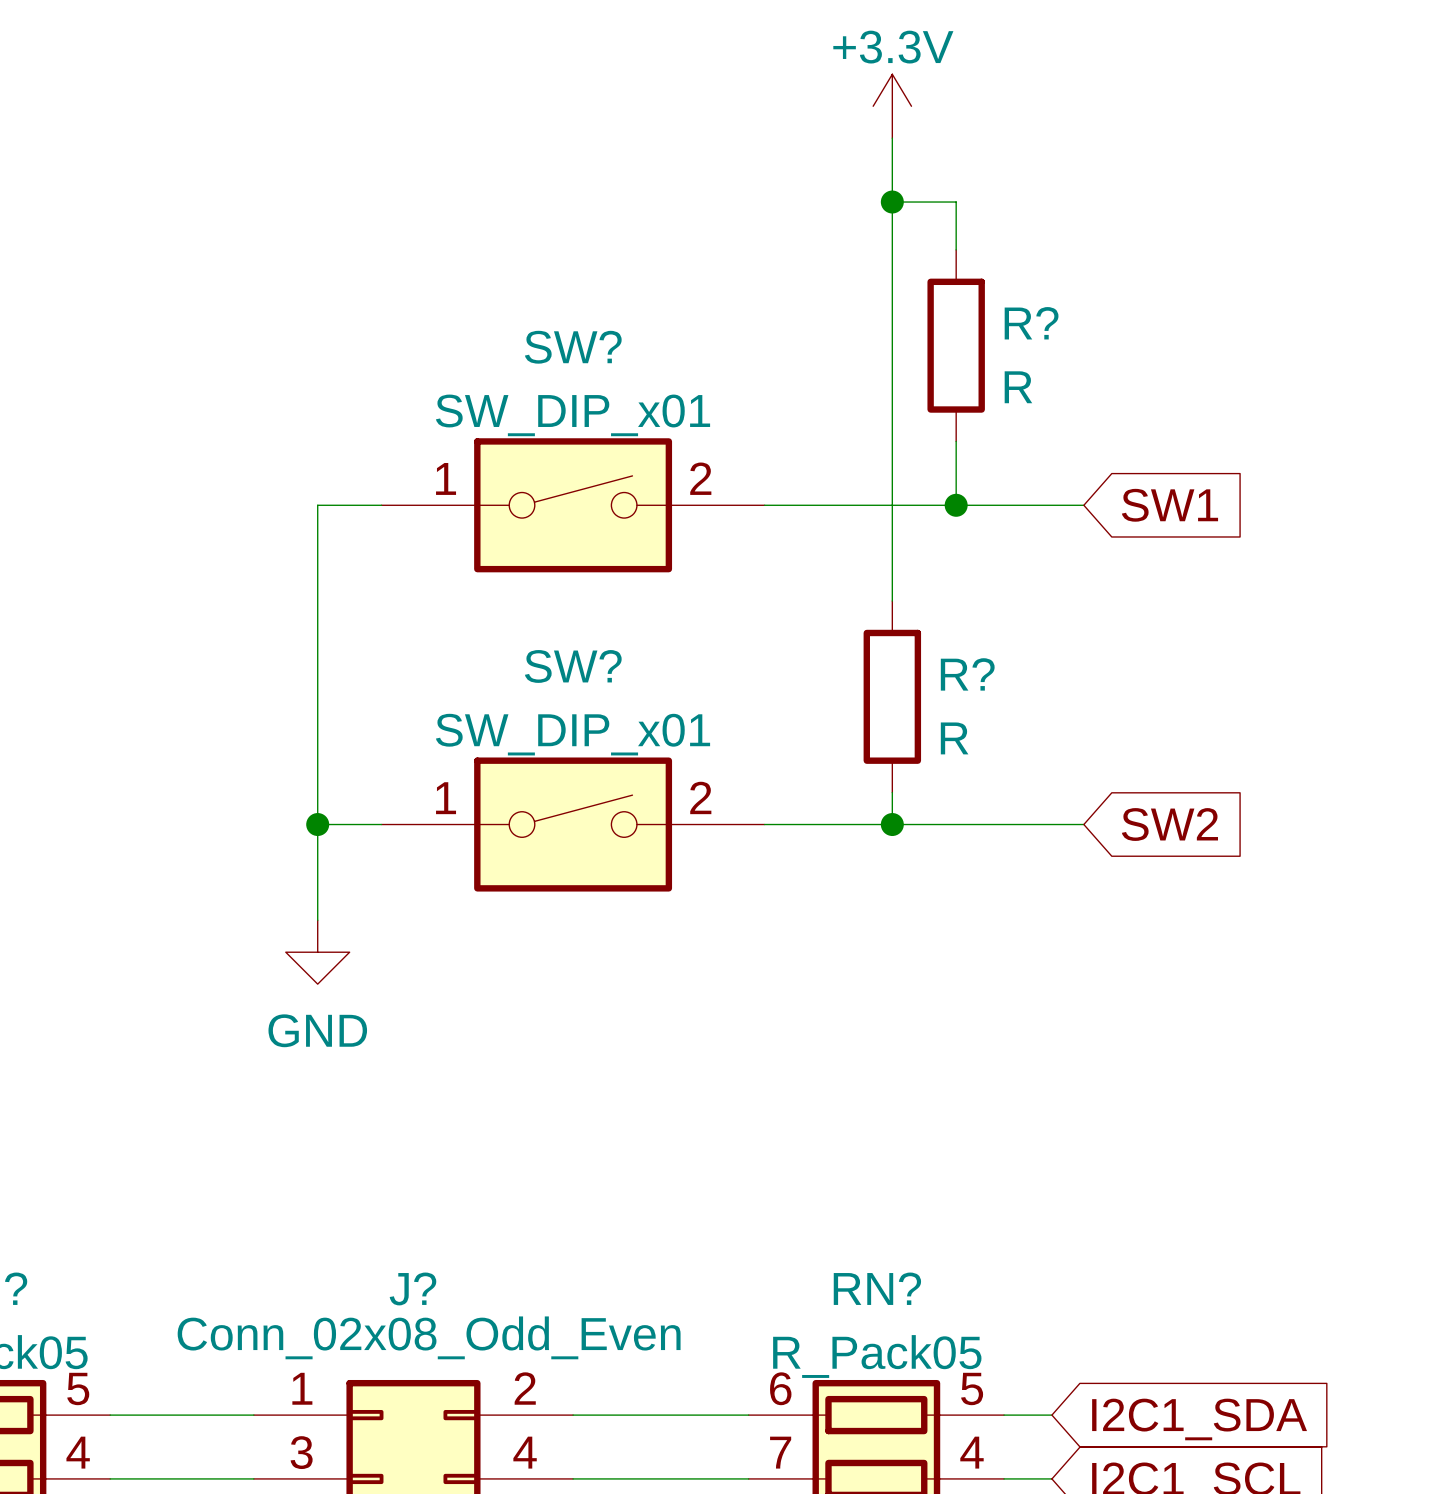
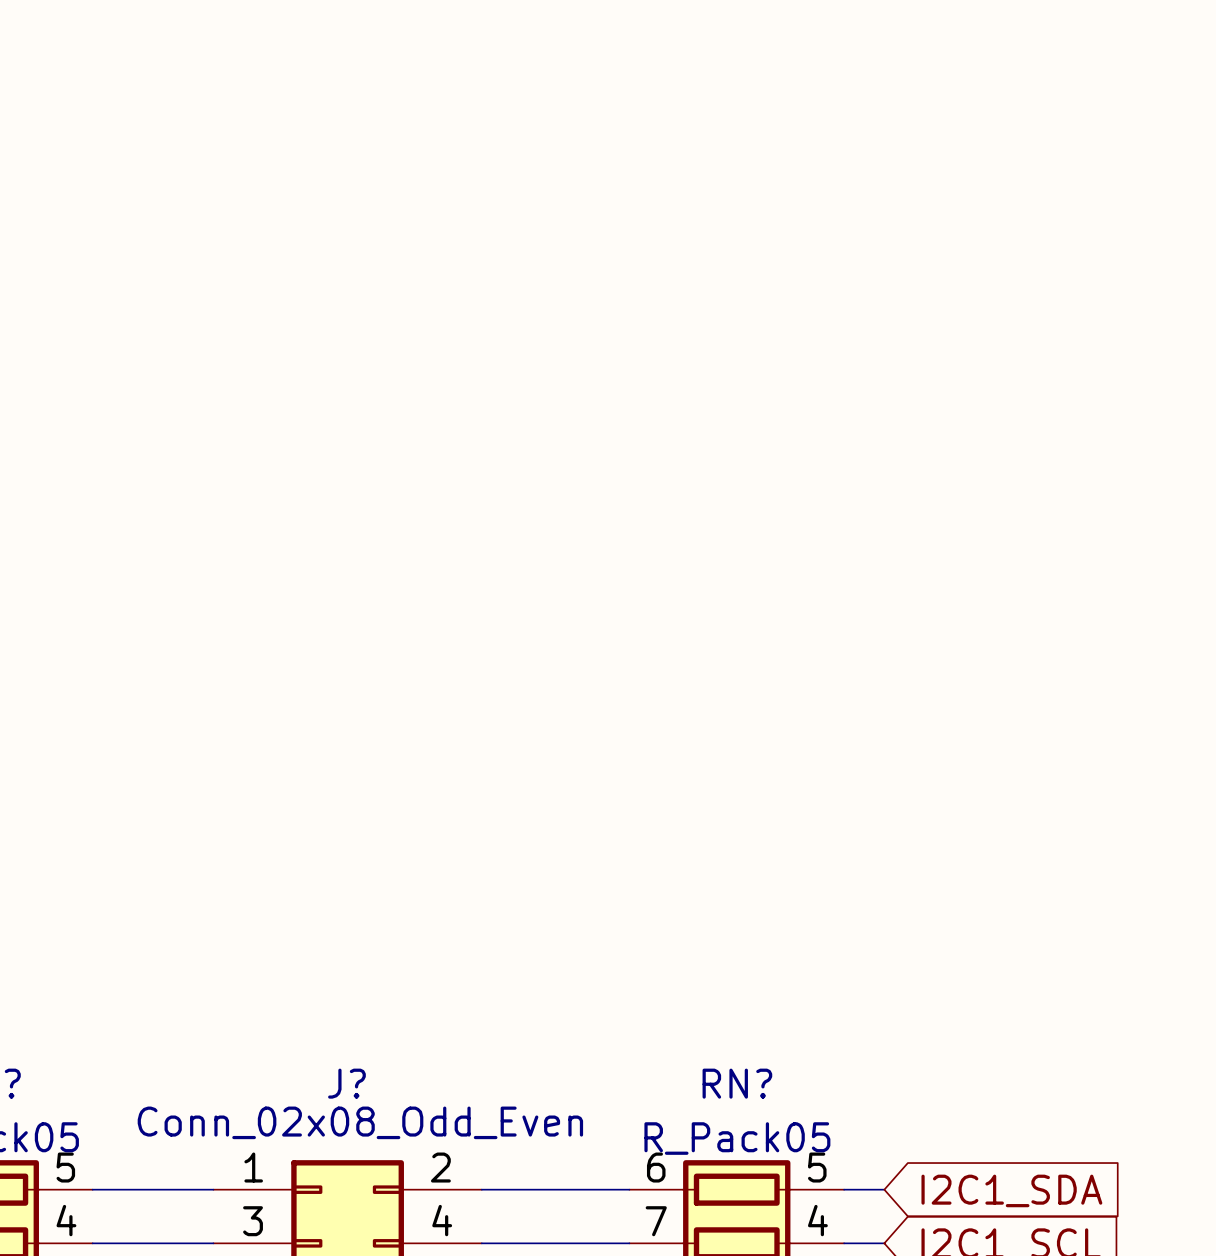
power symbol: +3.3V (892, 106) -> none
wire: (892, 138) (892, 601) -> none
wire: (892, 202) (956, 202) (956, 249) -> none
junction: (892, 202) -> none
R?: R (956, 345) -> none
wire: (956, 441) (956, 505) -> none
wire: (381, 505) (317, 505) (317, 920) -> none
SW?: SW_DIP_x01 (573, 505) -> none
wire: (764, 505) (1083, 505) -> none
junction: (956, 505) -> none
global label: SW1 (1169, 505) -> none
R?: R (892, 696) -> none
wire: (892, 792) (892, 824) -> none
wire: (317, 824) (381, 824) -> none
junction: (317, 824) -> none
SW?: SW_DIP_x01 (573, 824) -> none
wire: (764, 824) (1083, 824) -> none
junction: (892, 824) -> none
global label: SW2 (1169, 824) -> none
power symbol: GND (317, 952) -> none

